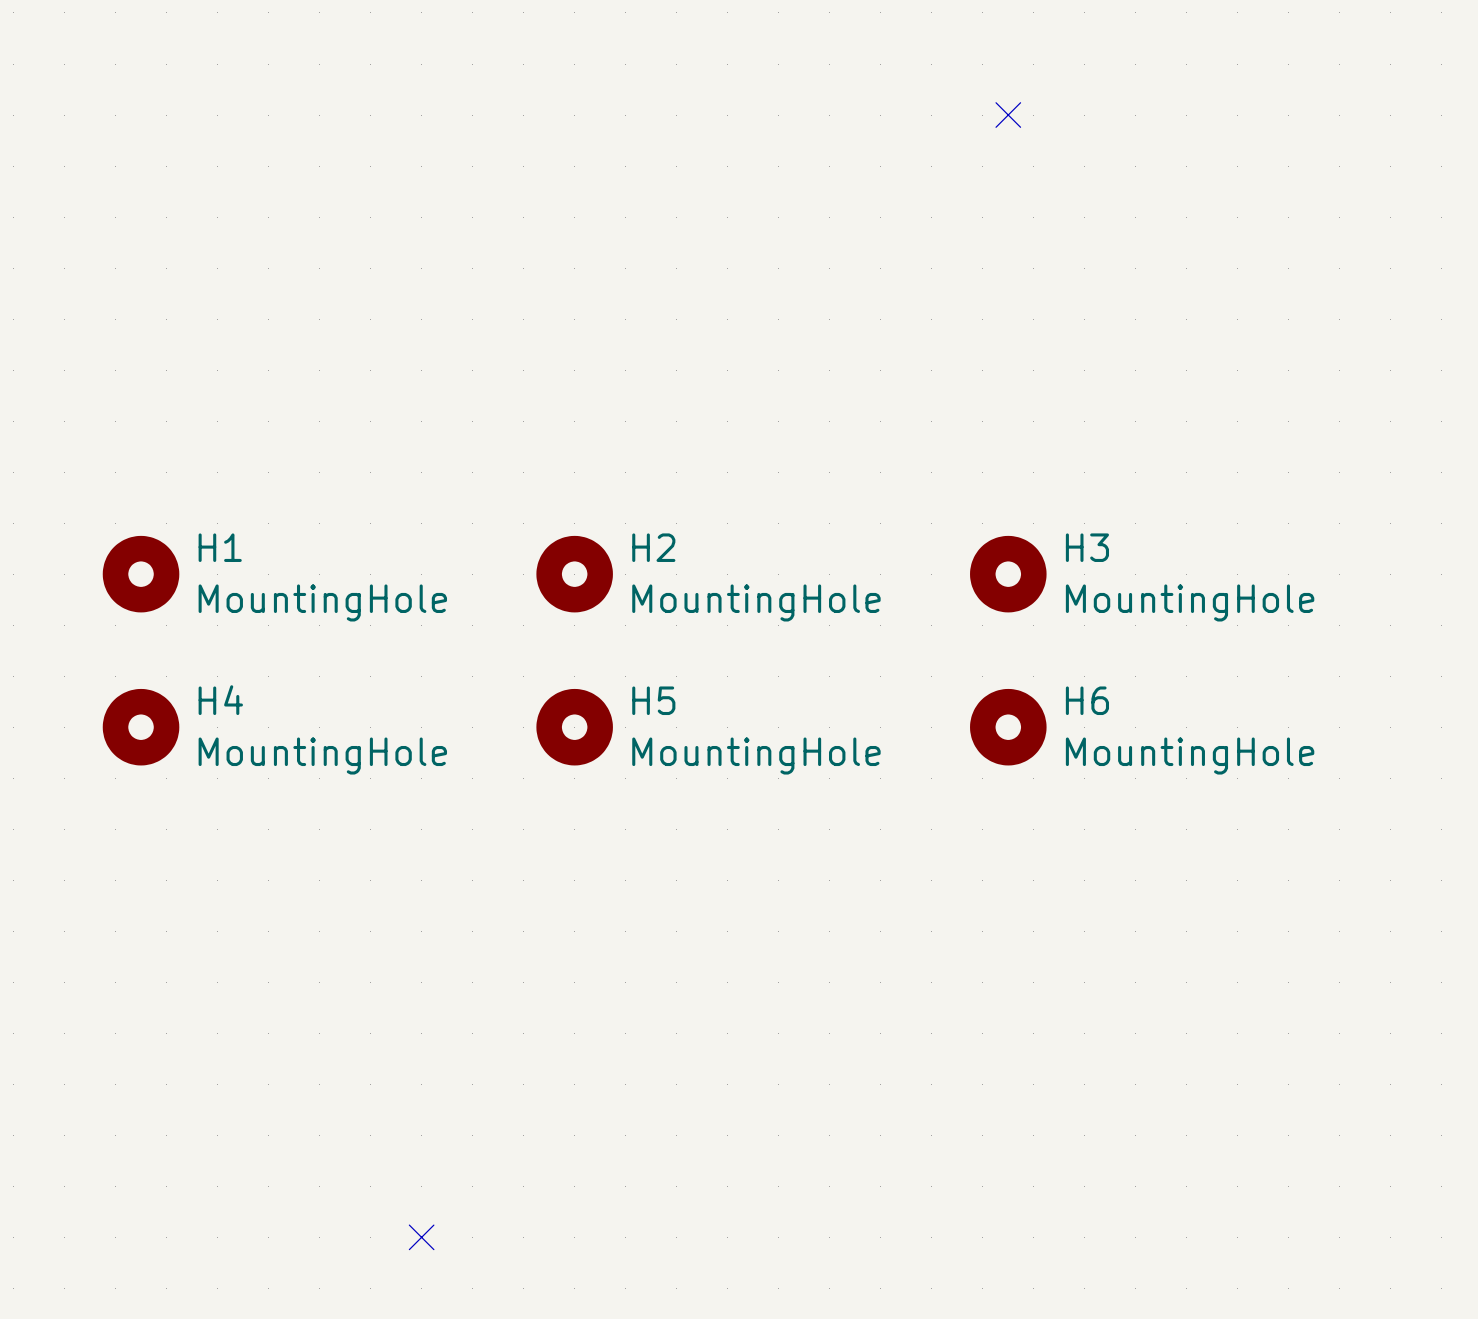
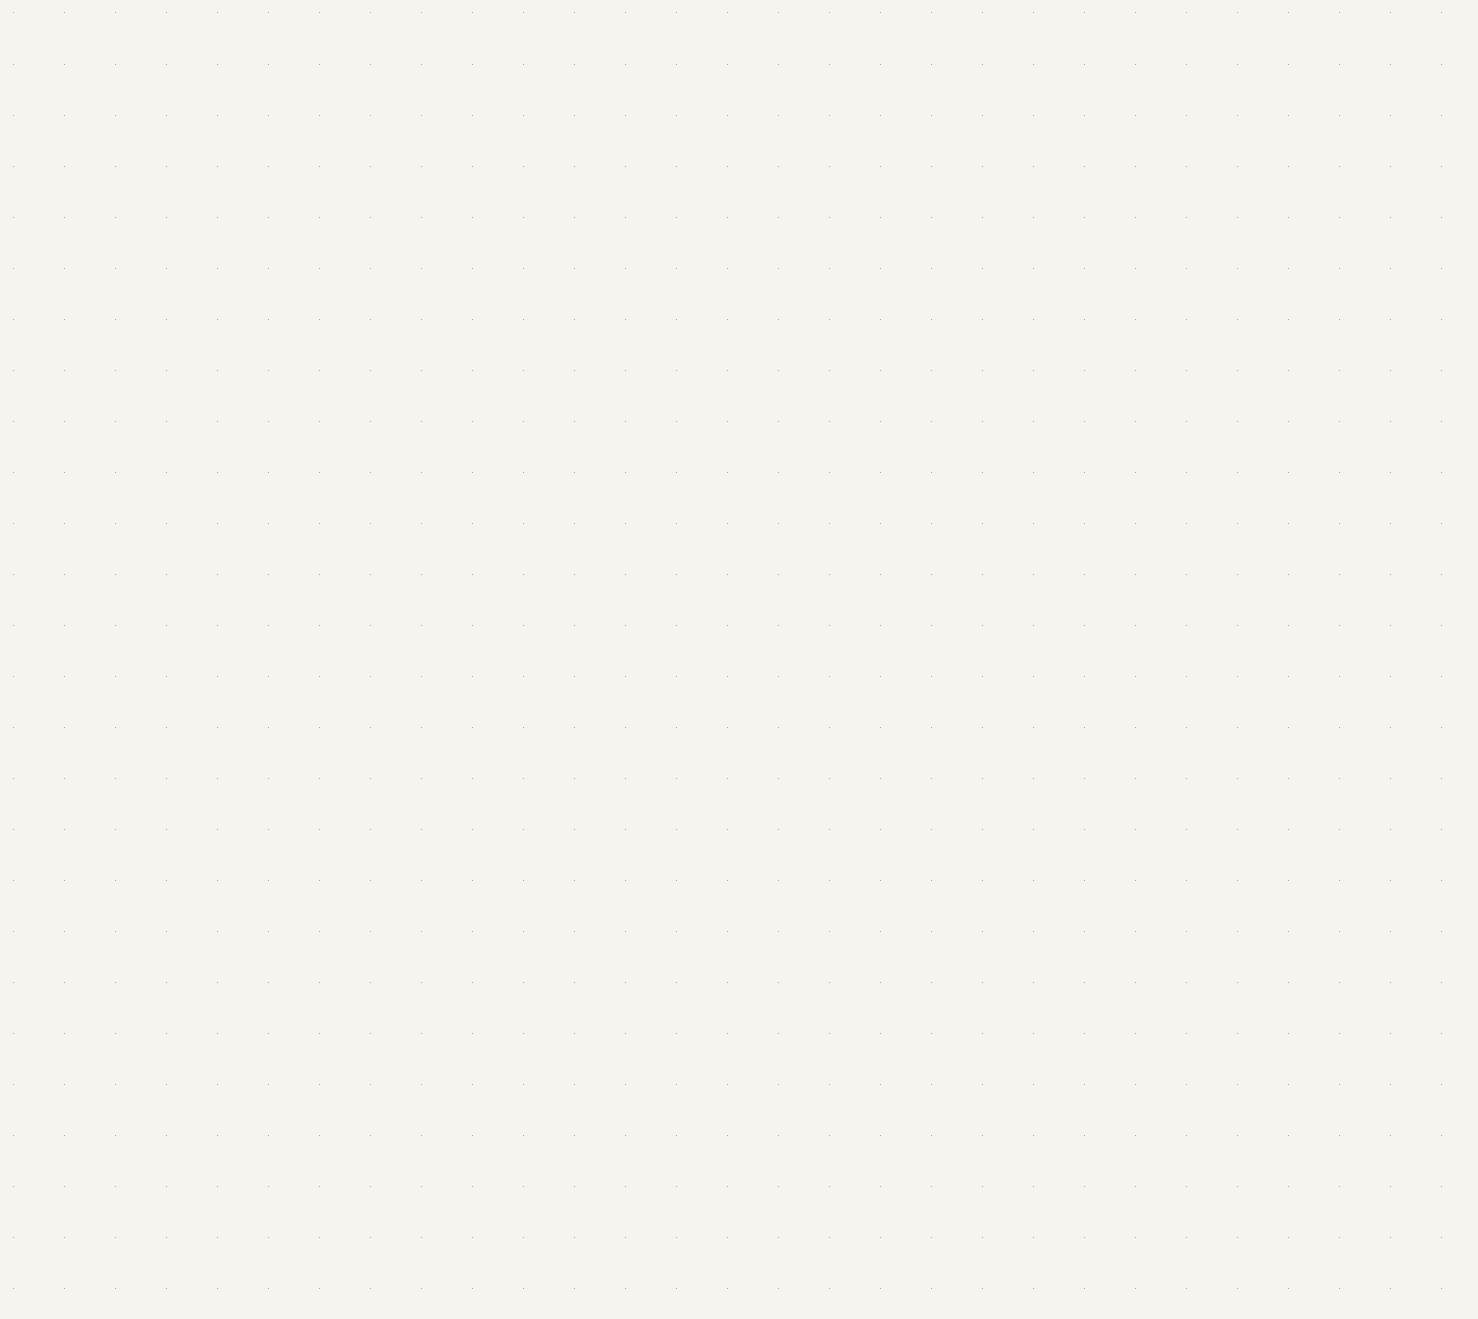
no-connect mark: (1008, 115) -> none
H1: MountingHole (141, 574) -> none
H2: MountingHole (574, 574) -> none
H3: MountingHole (1008, 574) -> none
H4: MountingHole (141, 727) -> none
H5: MountingHole (574, 727) -> none
H6: MountingHole (1008, 727) -> none
no-connect mark: (421, 1237) -> none

